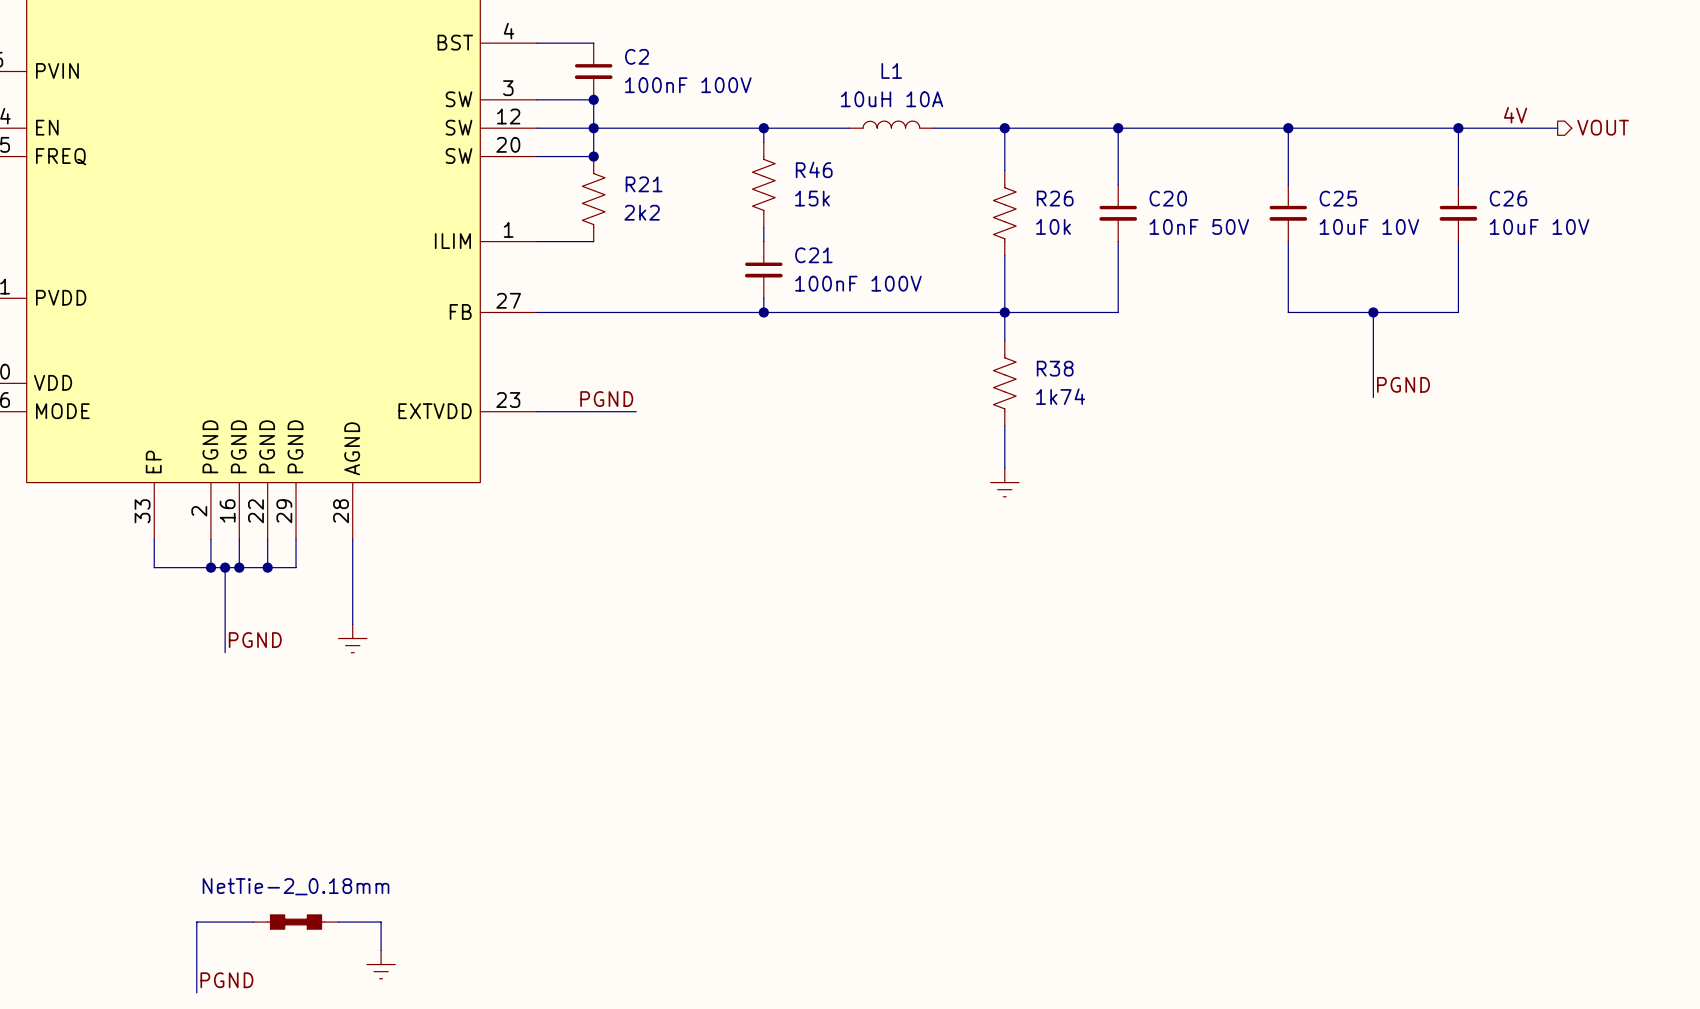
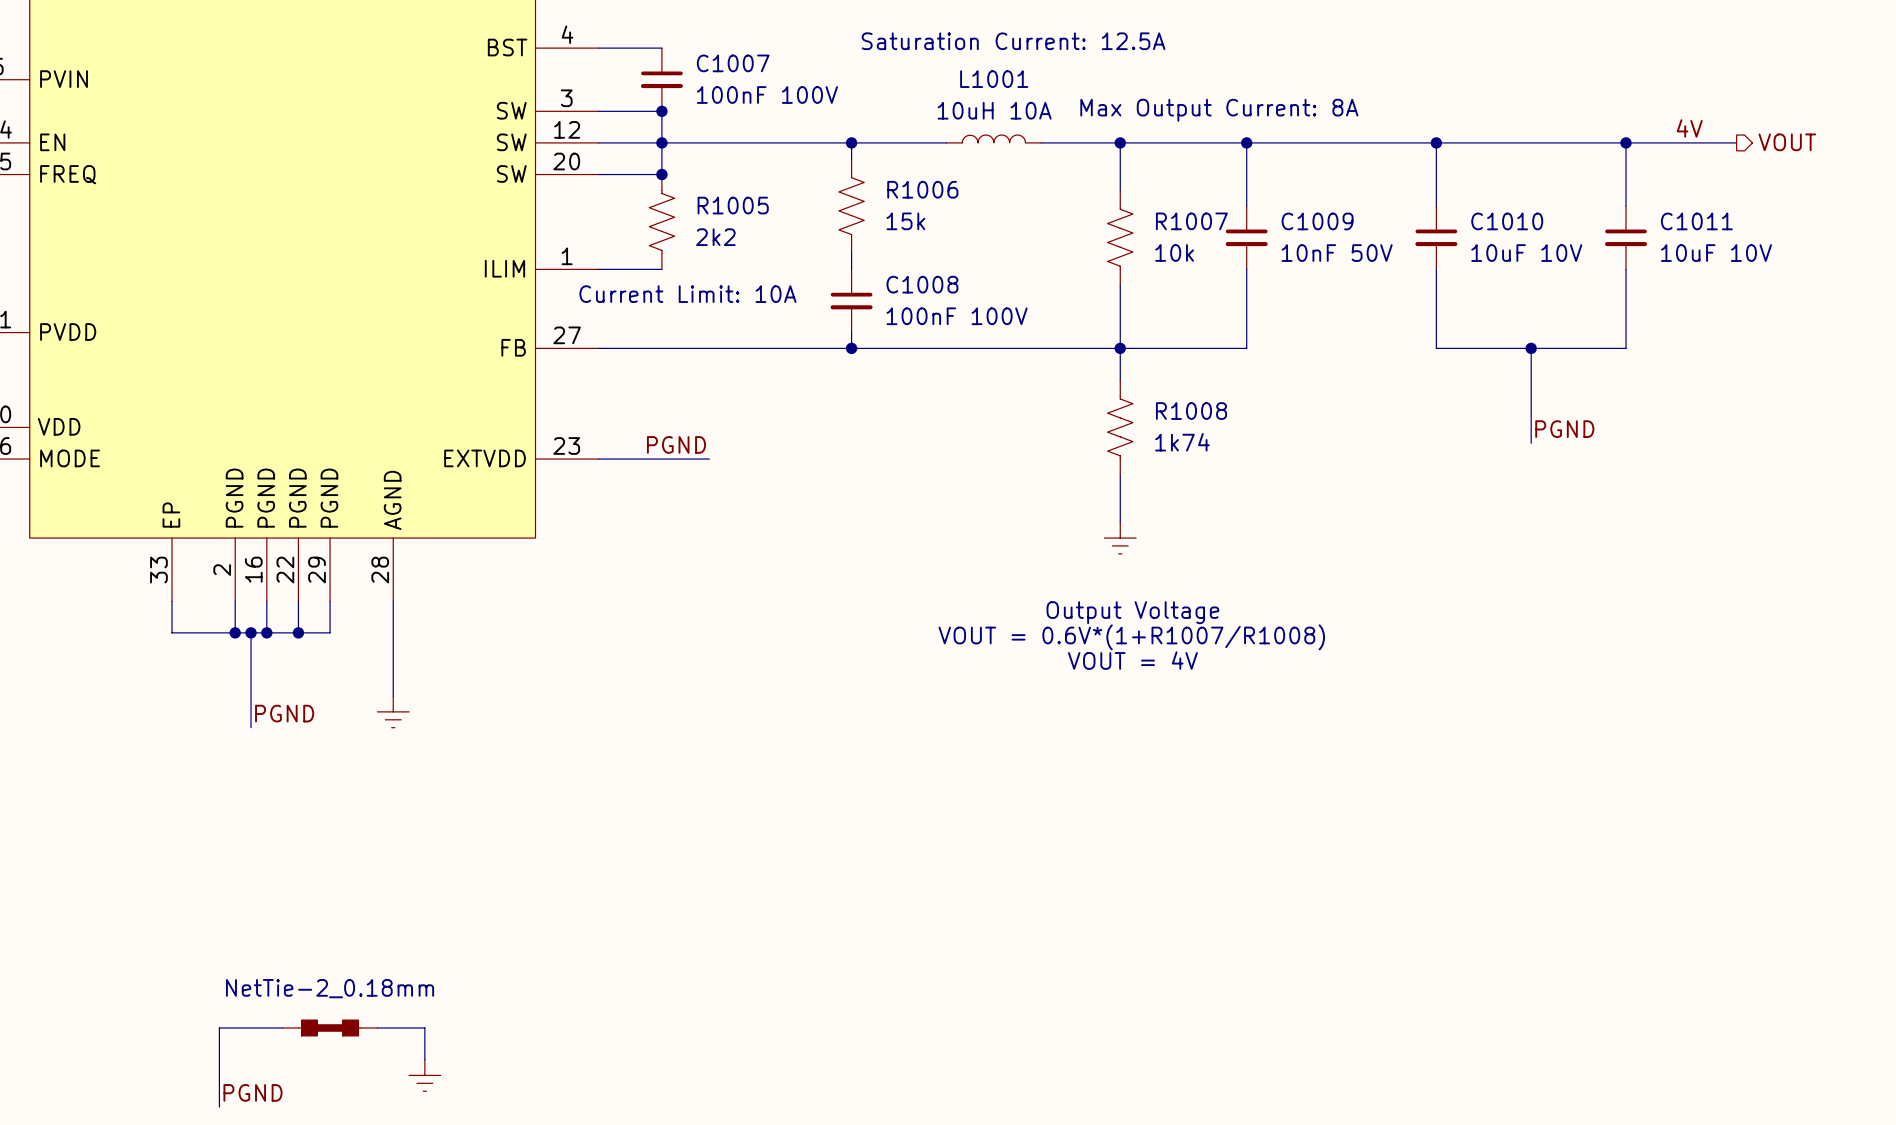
text: none -> Saturation Current: 12.5A (1013, 41)
C2 name: C2 (637, 56) -> C1007 (733, 63)
L1 name: L1 (891, 70) -> L1001 (994, 79)
text: none -> Max Output Current: 8A (1219, 110)
R46 name: R46 (814, 169) -> R1006 (922, 189)
R21 name: R21 (644, 184) -> R1005 (733, 205)
R26 name: R26 (1055, 198) -> R1007 (1191, 221)
C20 name: C20 (1168, 198) -> C1009 (1317, 221)
C25 name: C25 (1338, 198) -> C1010 (1507, 221)
C26 name: C26 (1508, 198) -> C1011 (1696, 221)
C21 name: C21 (813, 255) -> C1008 (922, 284)
text: none -> Current Limit: 10A (687, 294)
R38 name: R38 (1055, 368) -> R1008 (1191, 411)
text: none -> Output Voltage (1132, 612)
text: none -> VOUT = 0.6V*(1+R1007/R1008) (1131, 637)
text: none -> VOUT = 4V (1132, 660)

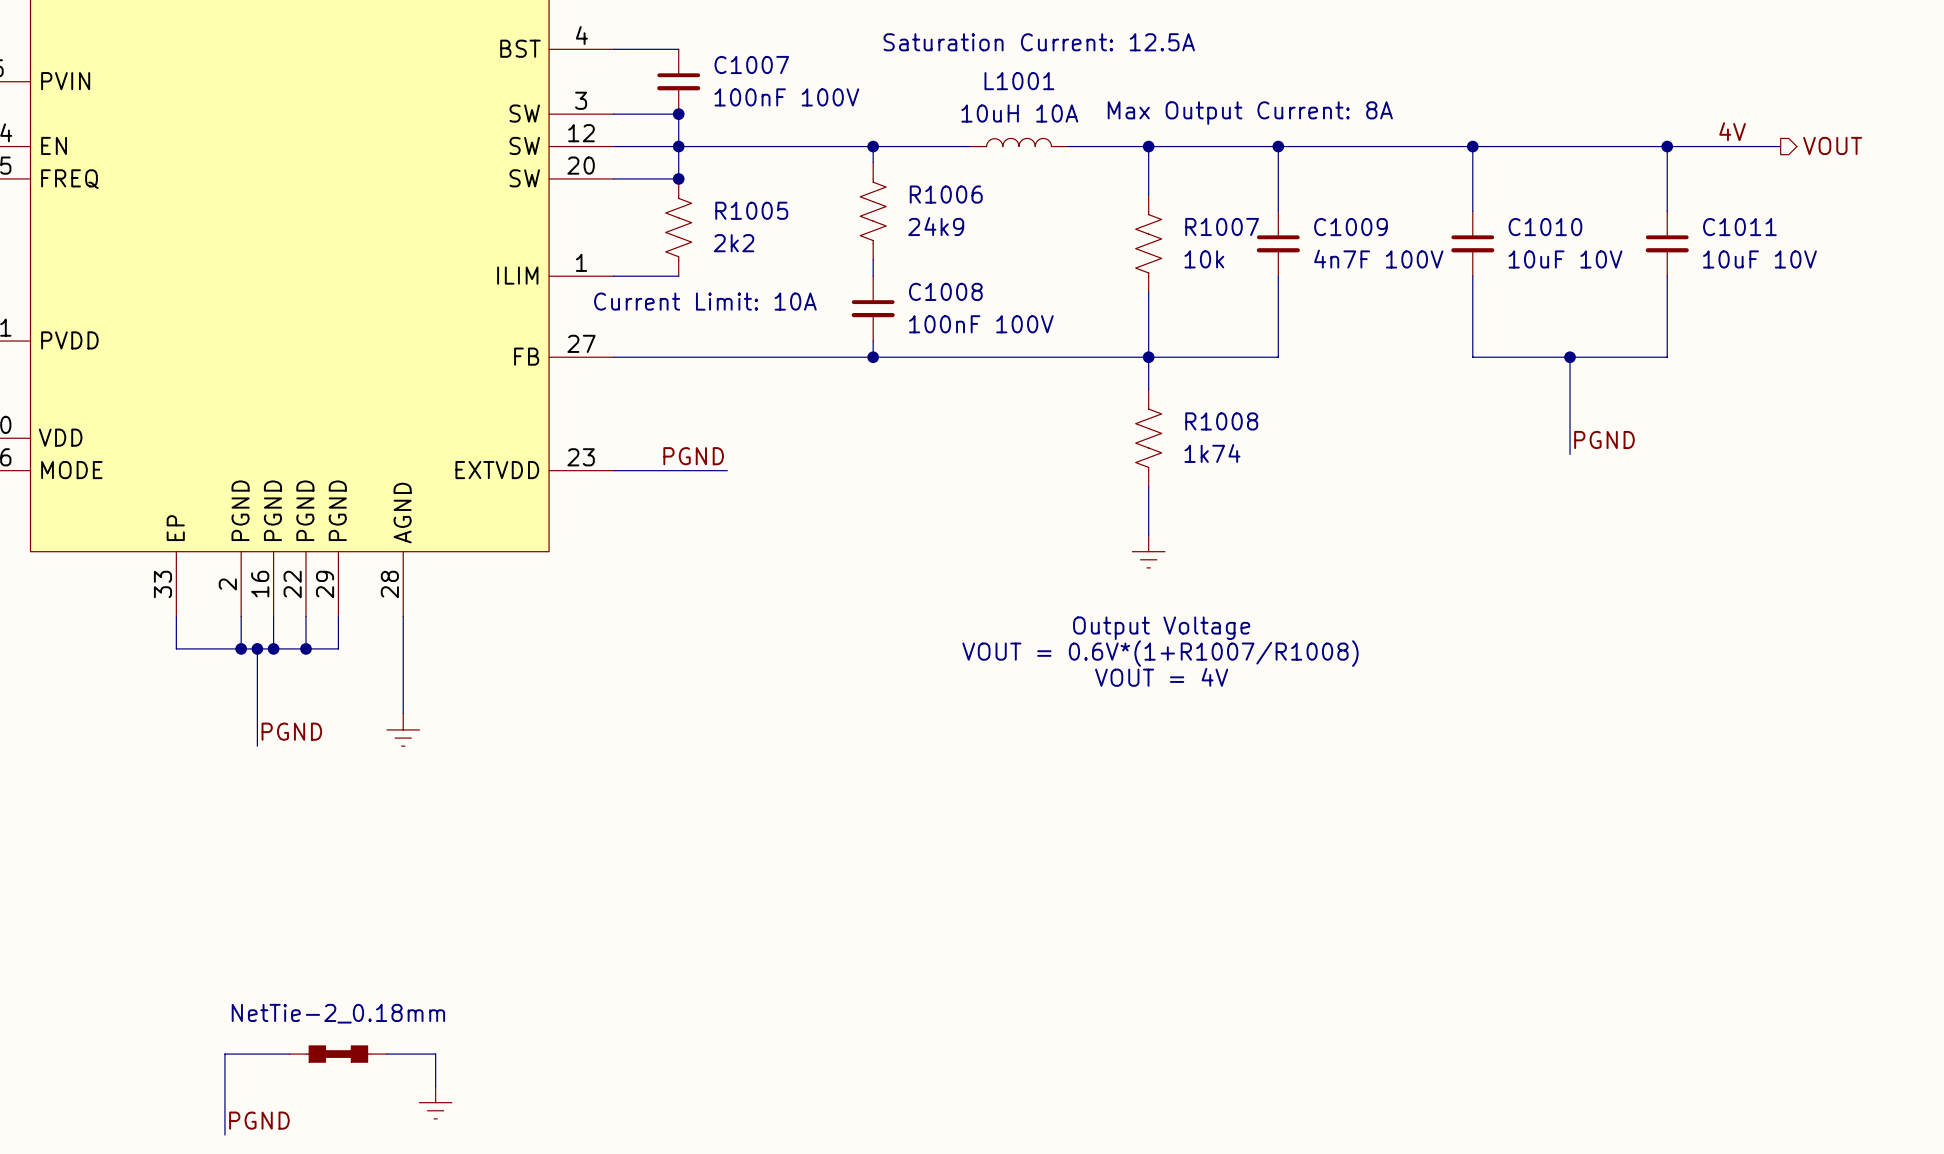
R1006 value: 15k (905, 221) -> 24k9 (936, 226)
C1009 value: 10nF 50V (1337, 253) -> 4n7F 100V (1378, 259)

